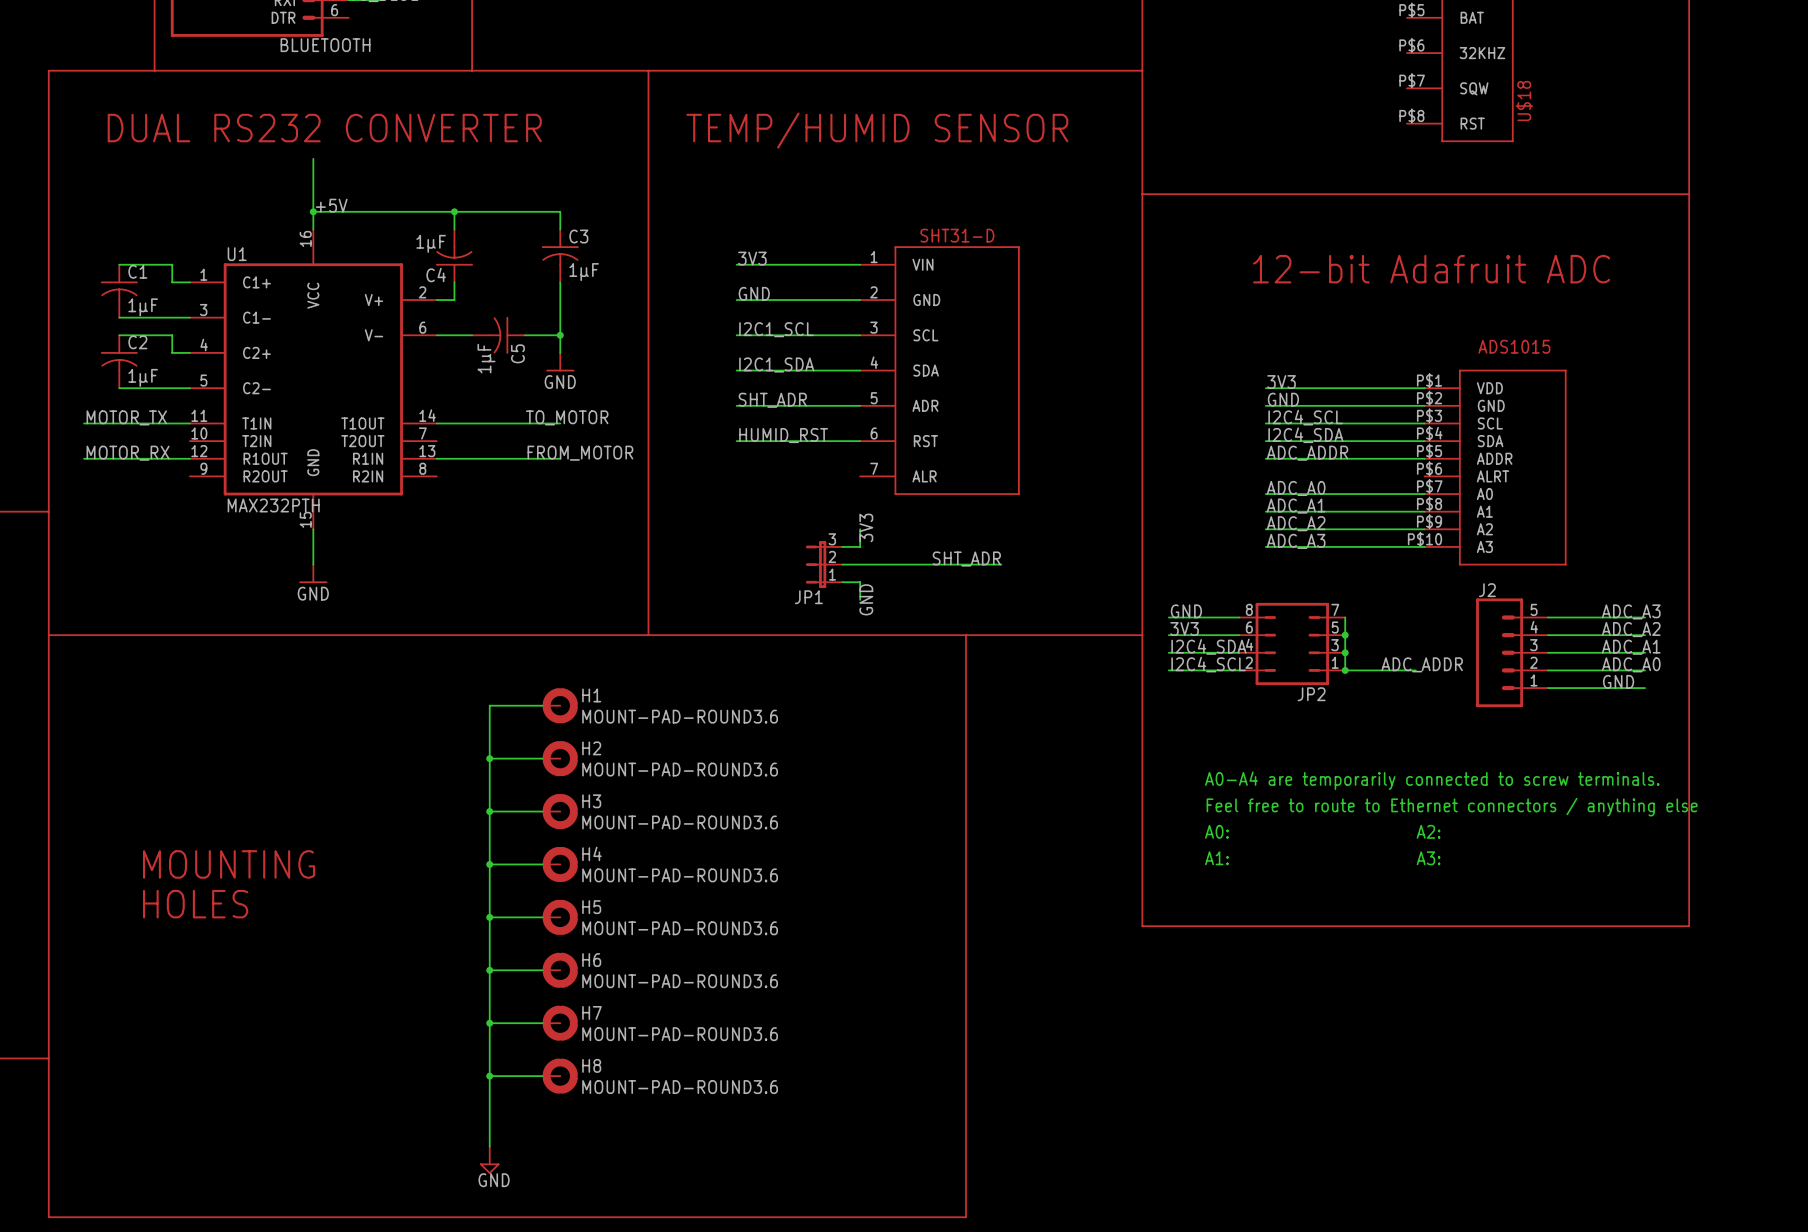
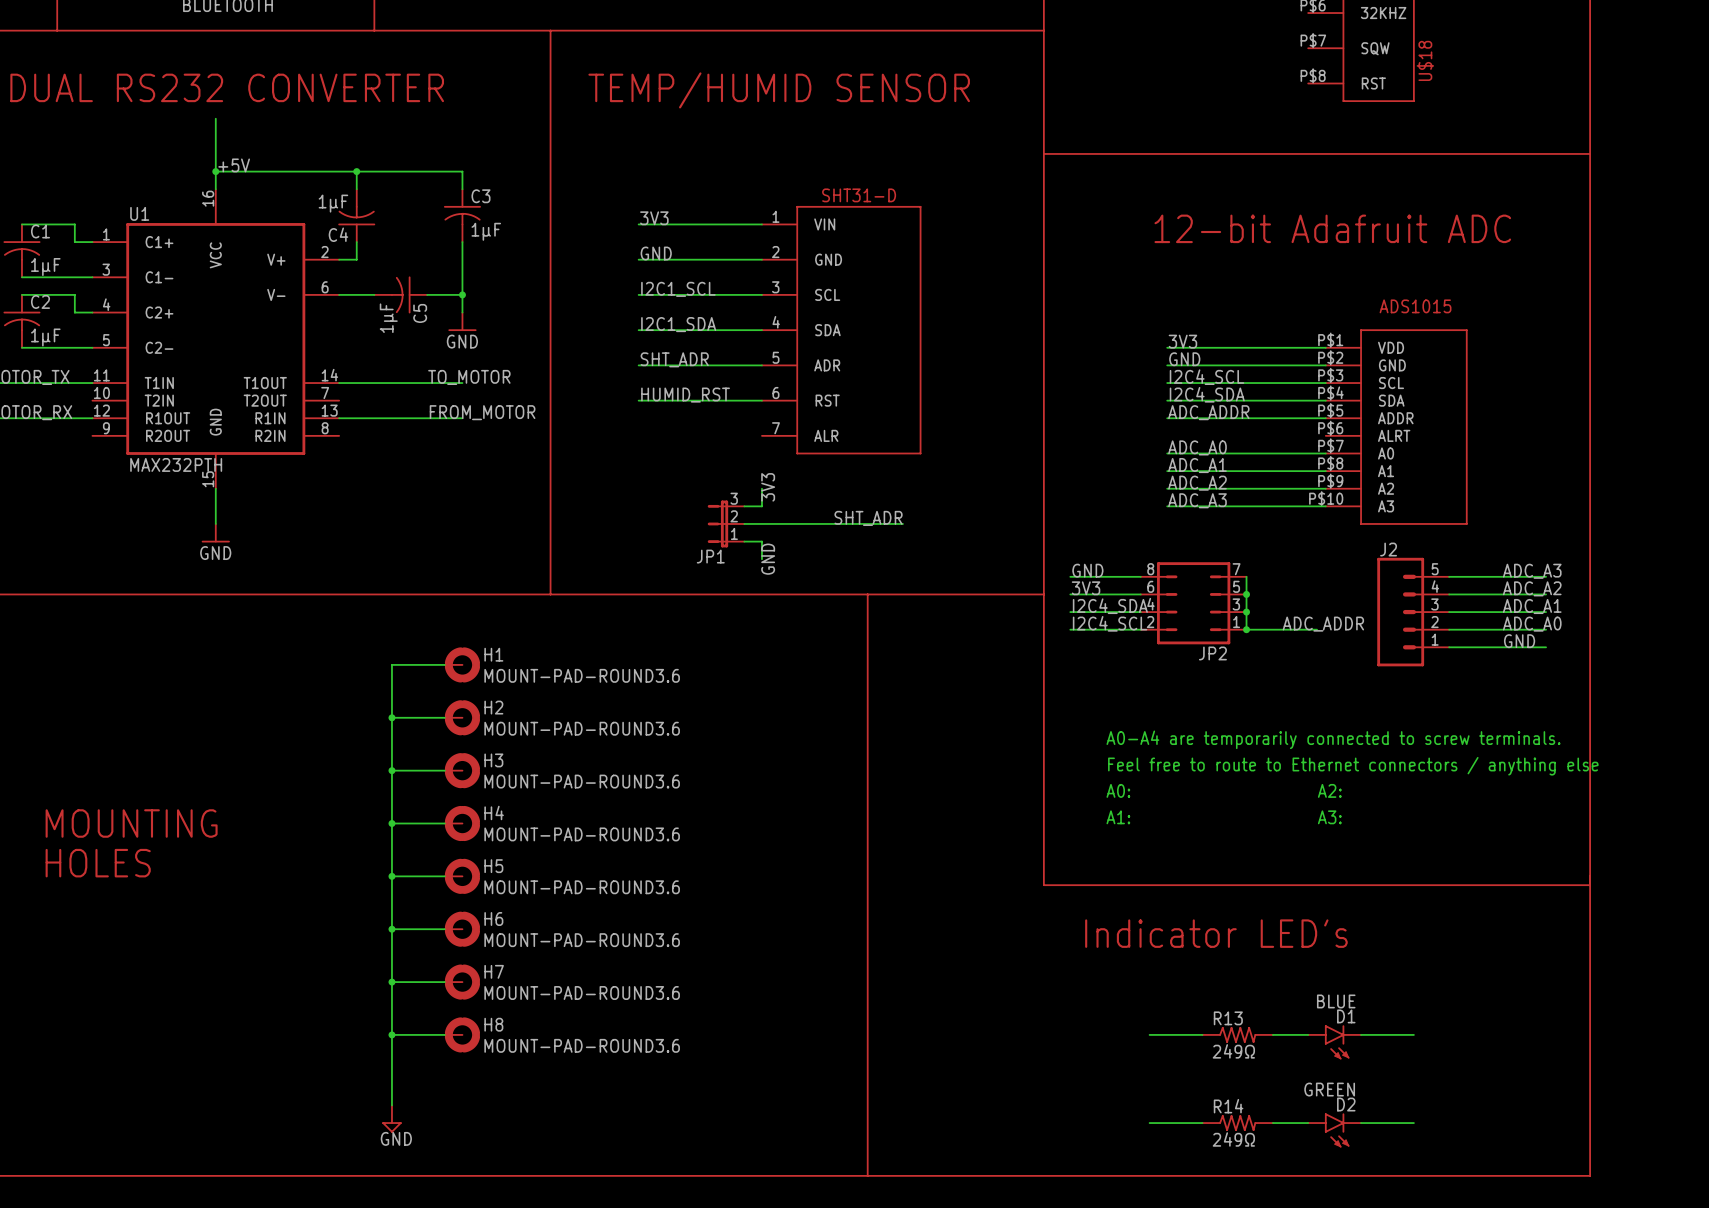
line: none -> (1590, 876) (1590, 1175) (867, 1175)
text: none -> Indicator LED's (1216, 933)
wire: none -> (1149, 1034) (1202, 1034)
R13: none -> 249Ω (1237, 1034)
wire: none -> (1272, 1034) (1308, 1034)
wire: none -> (1361, 1034) (1413, 1034)
D1: none -> BLUE (1334, 1042)
wire: none -> (1149, 1123) (1202, 1123)
R14: none -> 249Ω (1237, 1123)
wire: none -> (1272, 1123) (1308, 1123)
wire: none -> (1361, 1123) (1413, 1123)
D2: none -> GREEN (1334, 1130)

